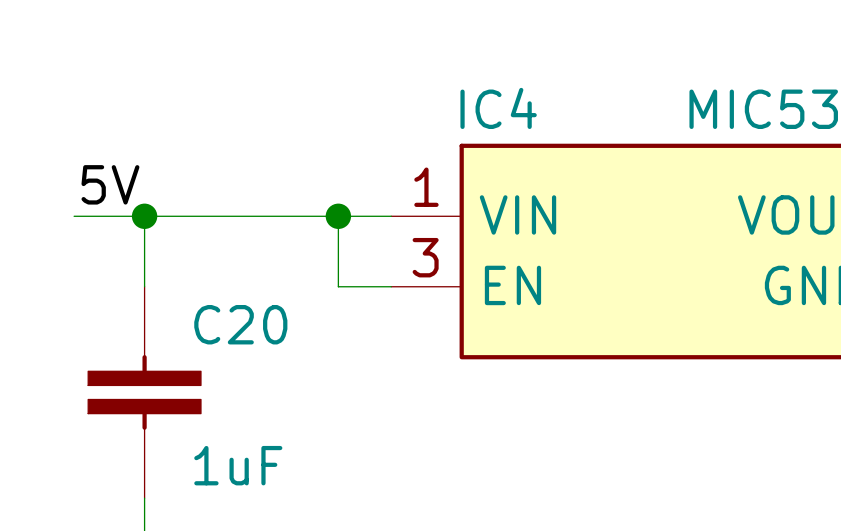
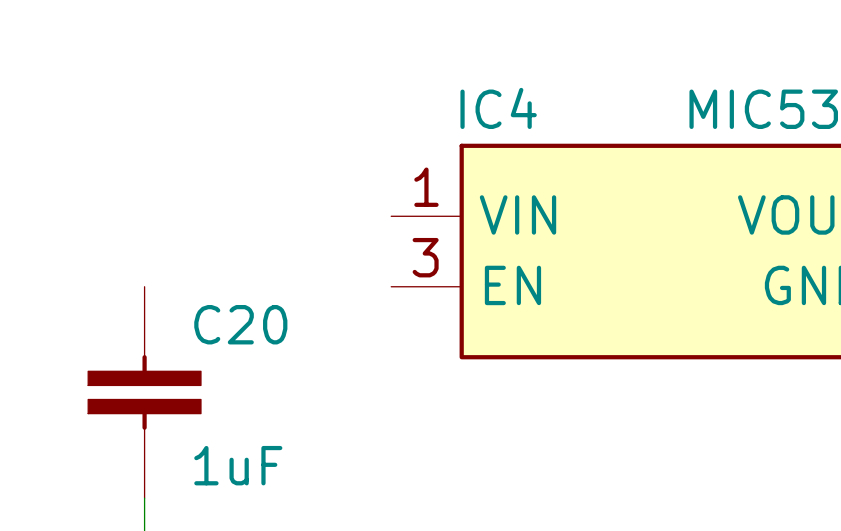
label: 5V (110, 184) -> none
wire: (74, 216) (391, 216) -> none
wire: (144, 216) (144, 286) -> none
junction: (144, 216) -> none
wire: (338, 216) (338, 286) (391, 286) -> none
junction: (338, 216) -> none

